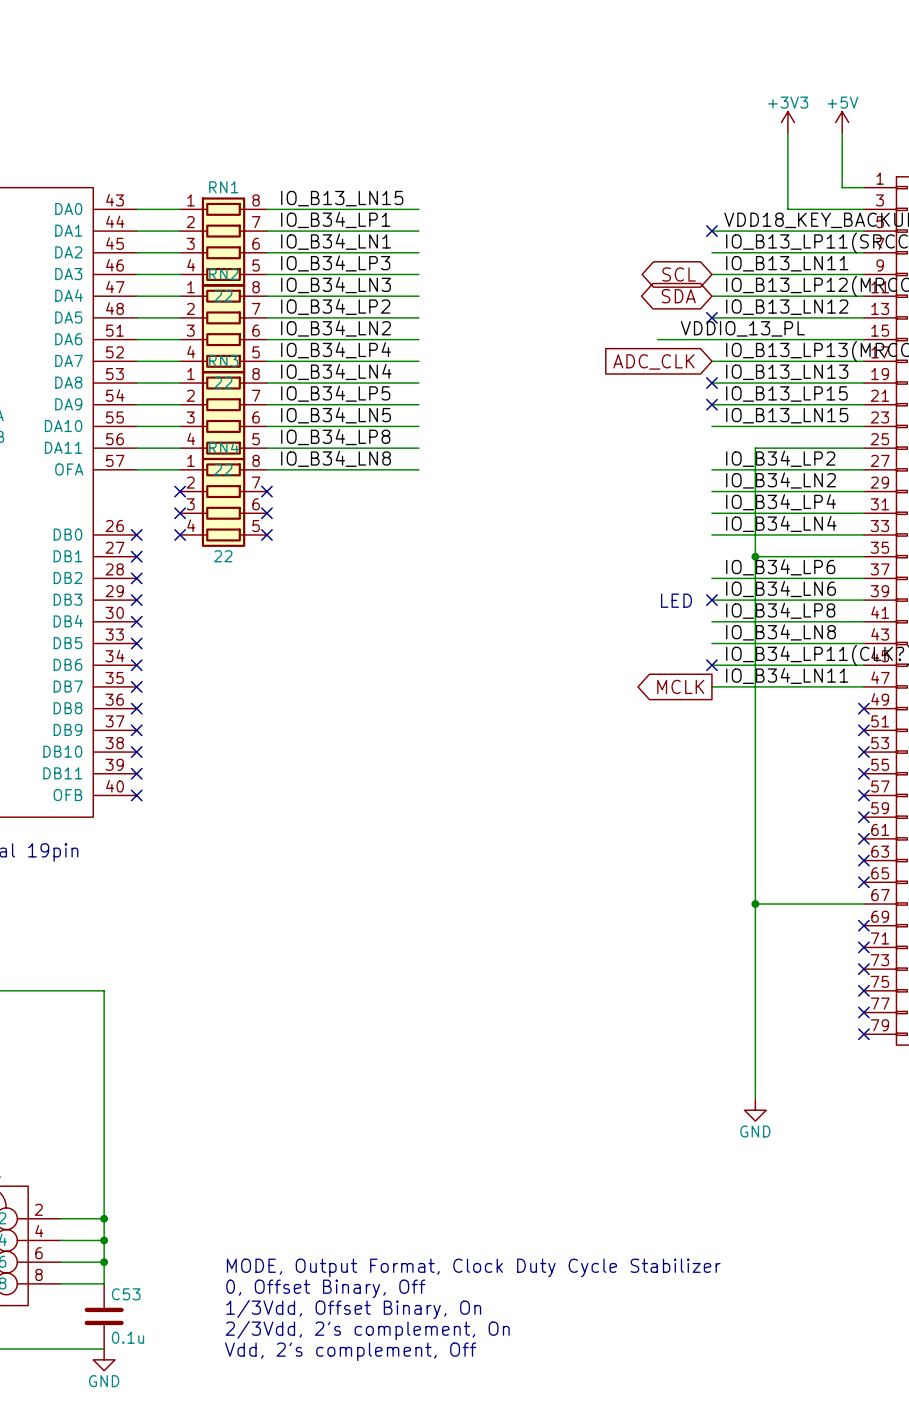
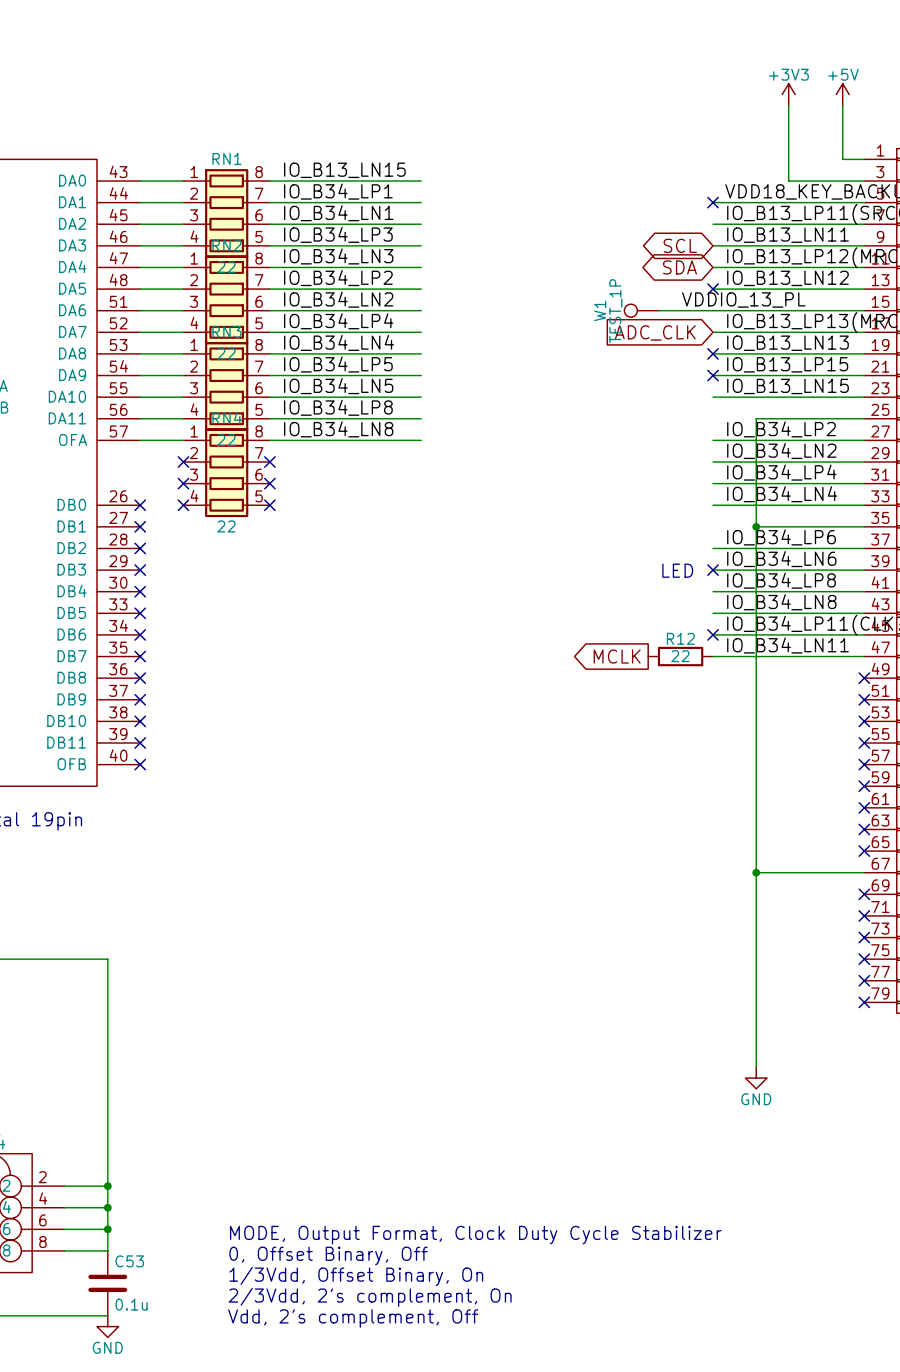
W1: none -> TEST_1P (641, 310)
R12: none -> 22 (680, 656)
global label position: MCLK (680, 686) -> MCLK (617, 656)

